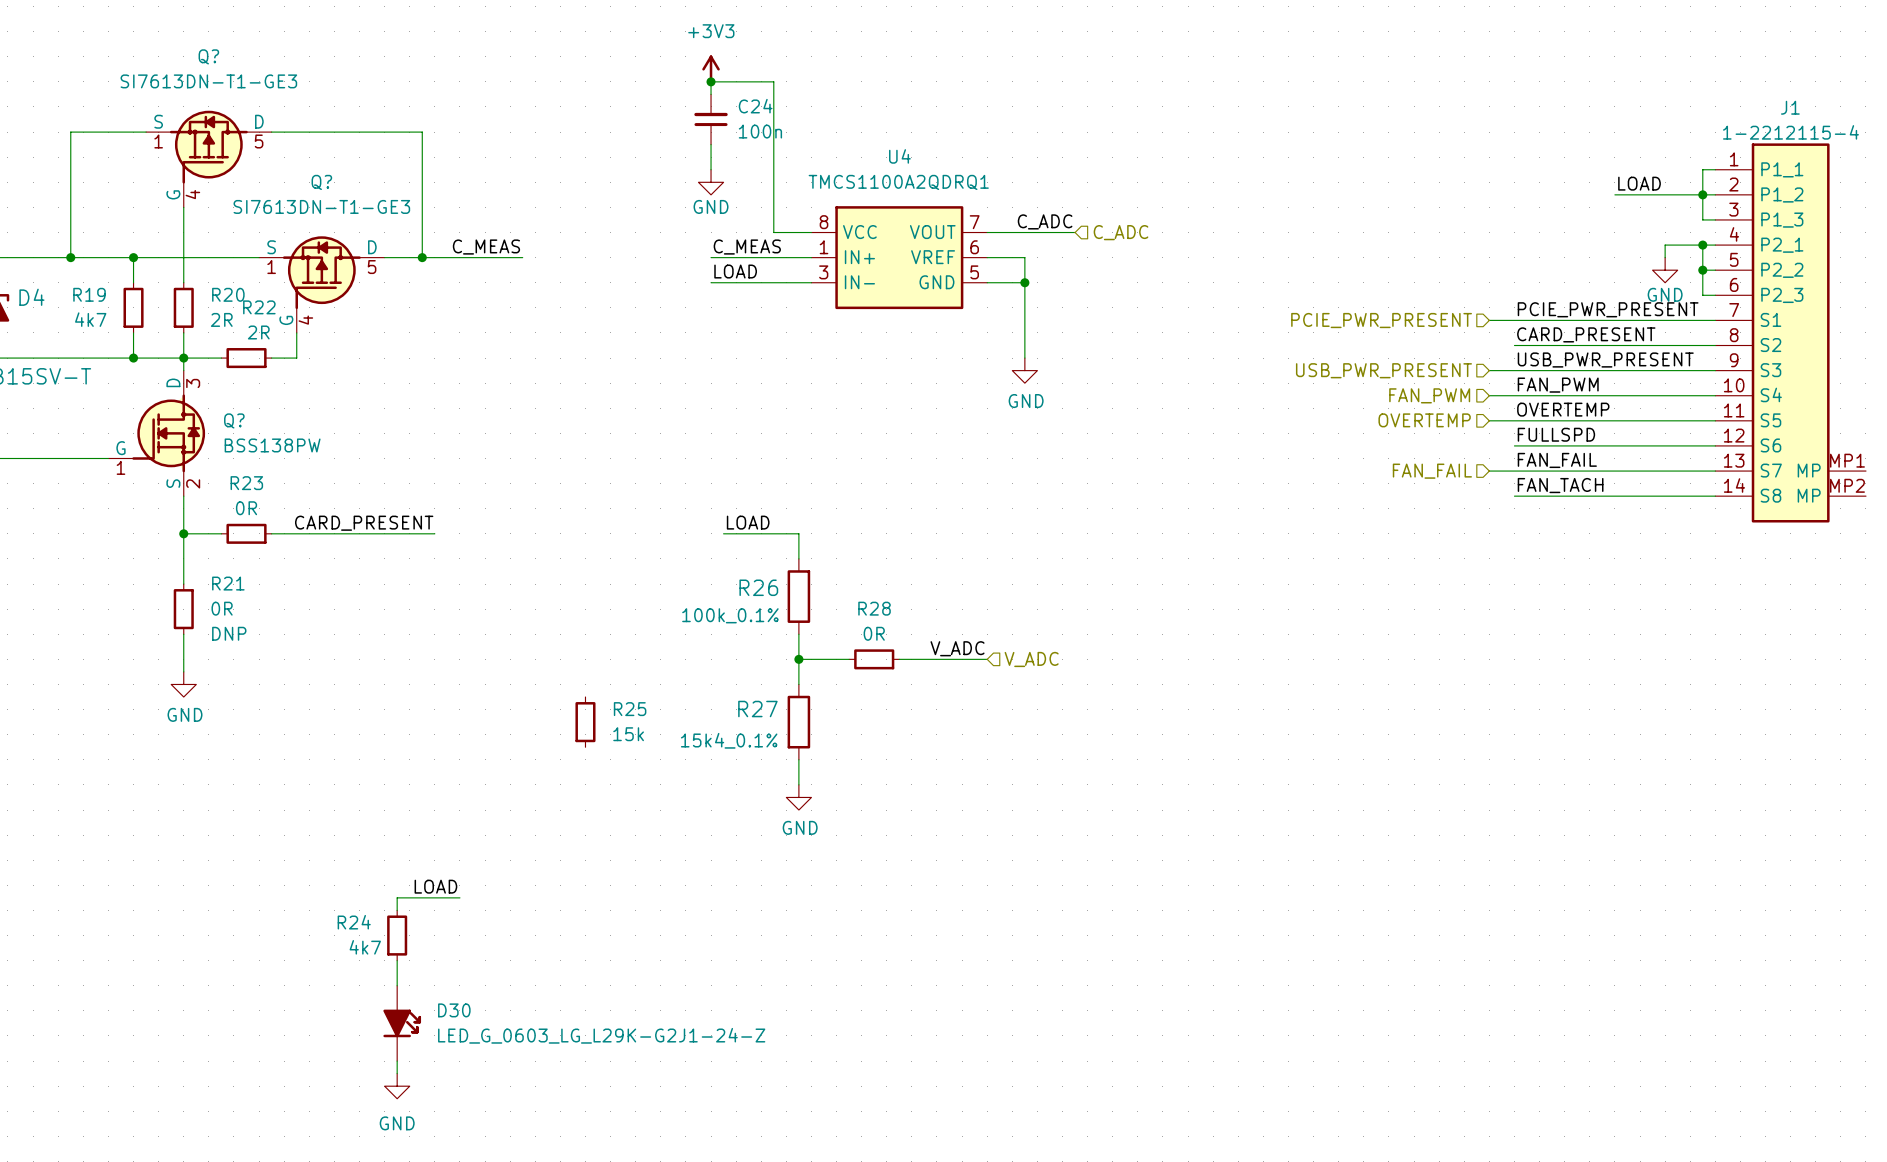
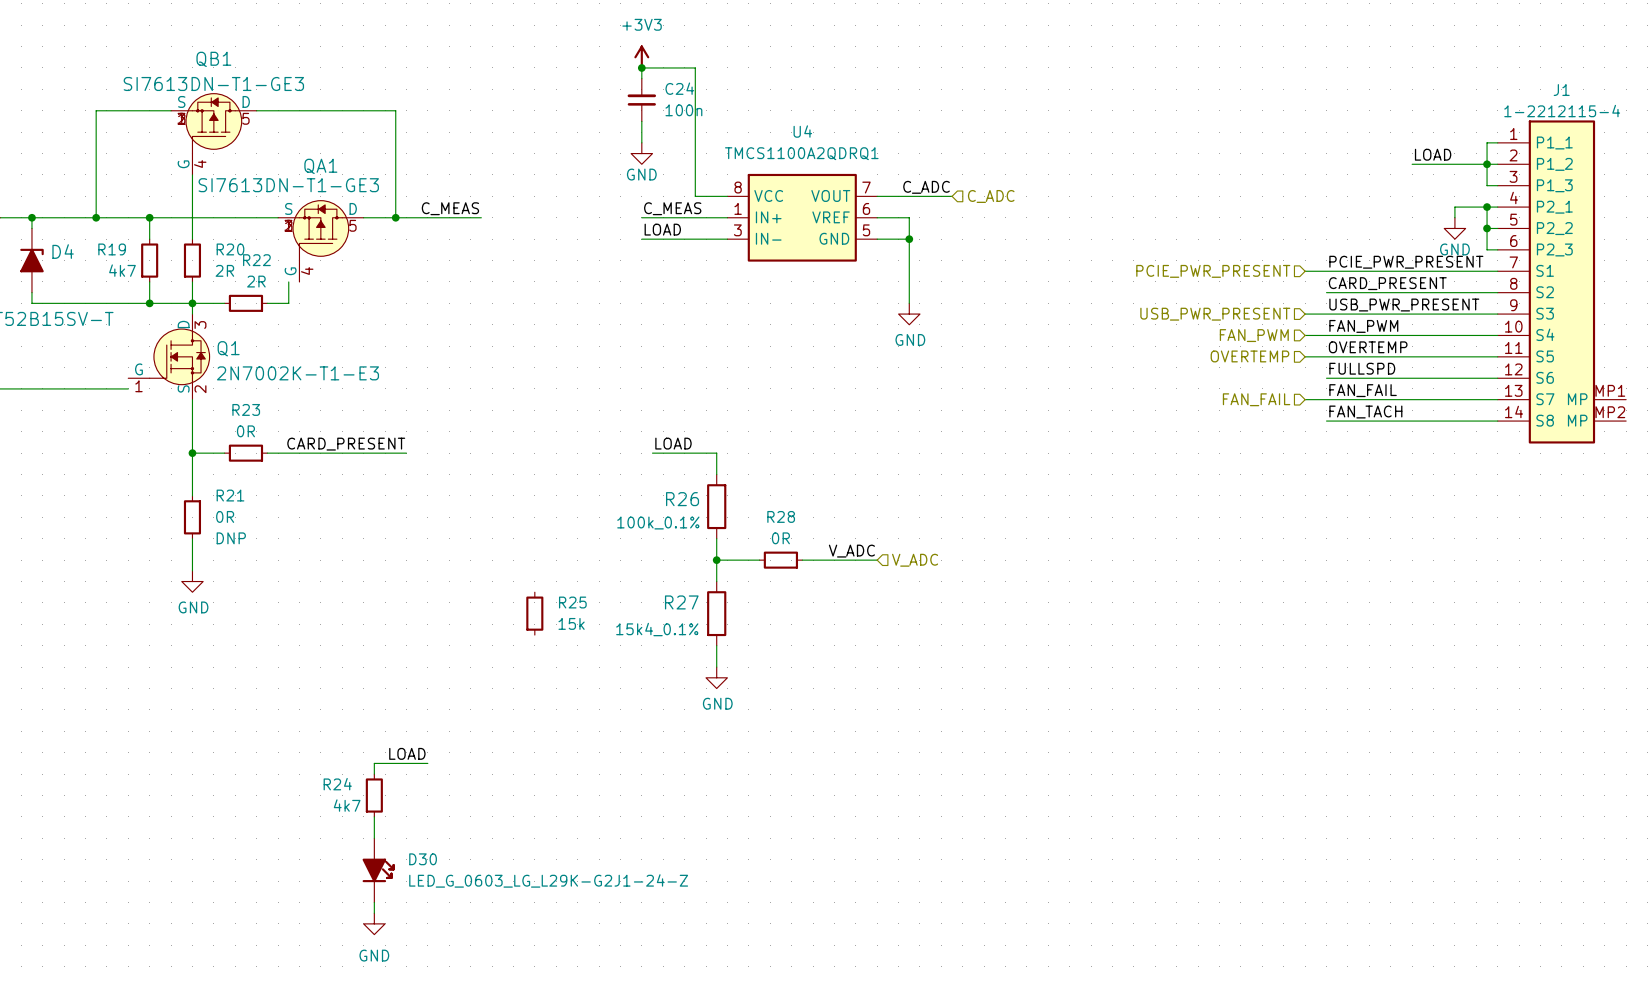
Q?: SI7613DN-T1-GE3 (208, 159) -> none
QB1: none -> SI7613DN-T1-GE3 (213, 134)
Q?: SI7613DN-T1-GE3 (321, 284) -> none
QA1: none -> SI7613DN-T1-GE3 (320, 241)
R19 text position: 4k7 (90, 319) -> 4k7 (122, 270)
Q1: none -> 2N7002K-T1-E3 (168, 356)
Q?: BSS138PW (156, 433) -> none

